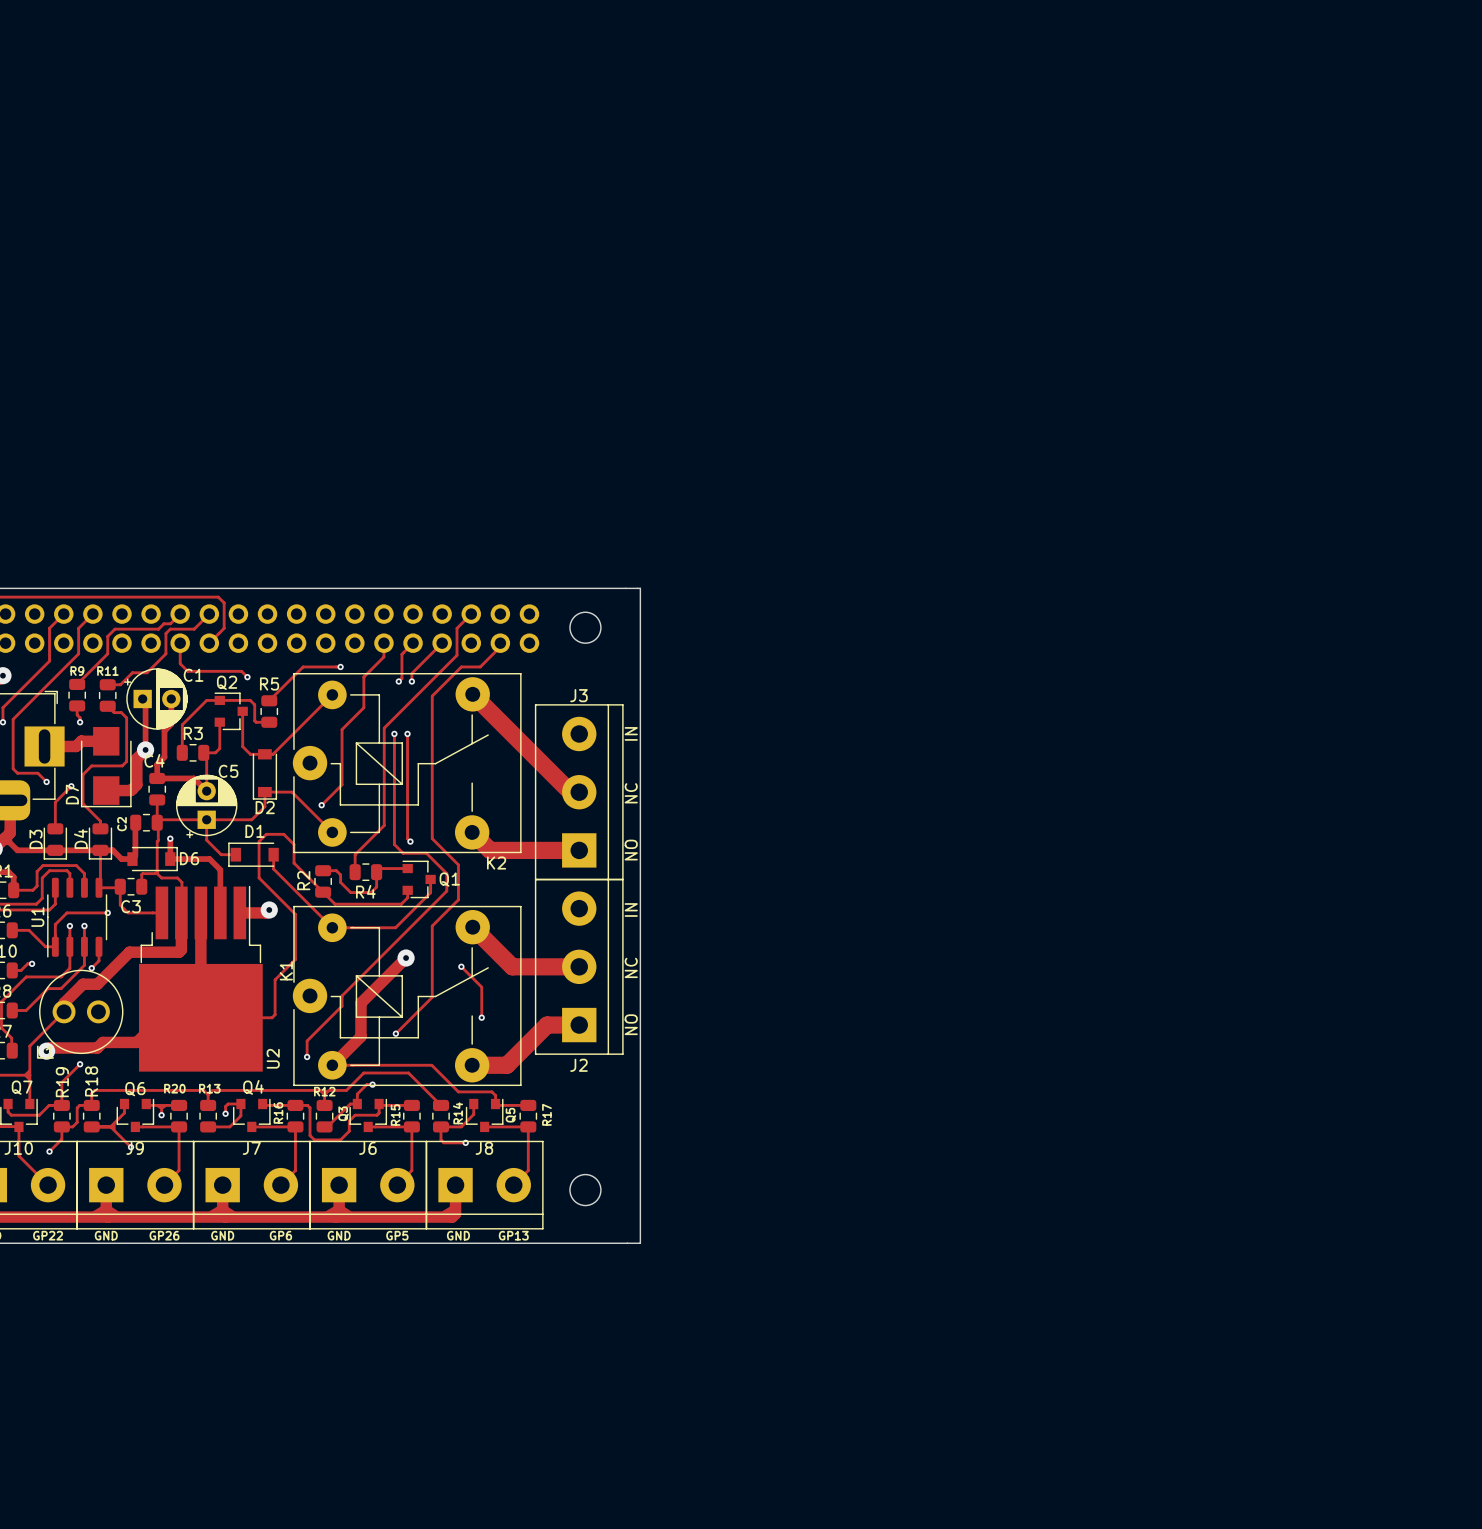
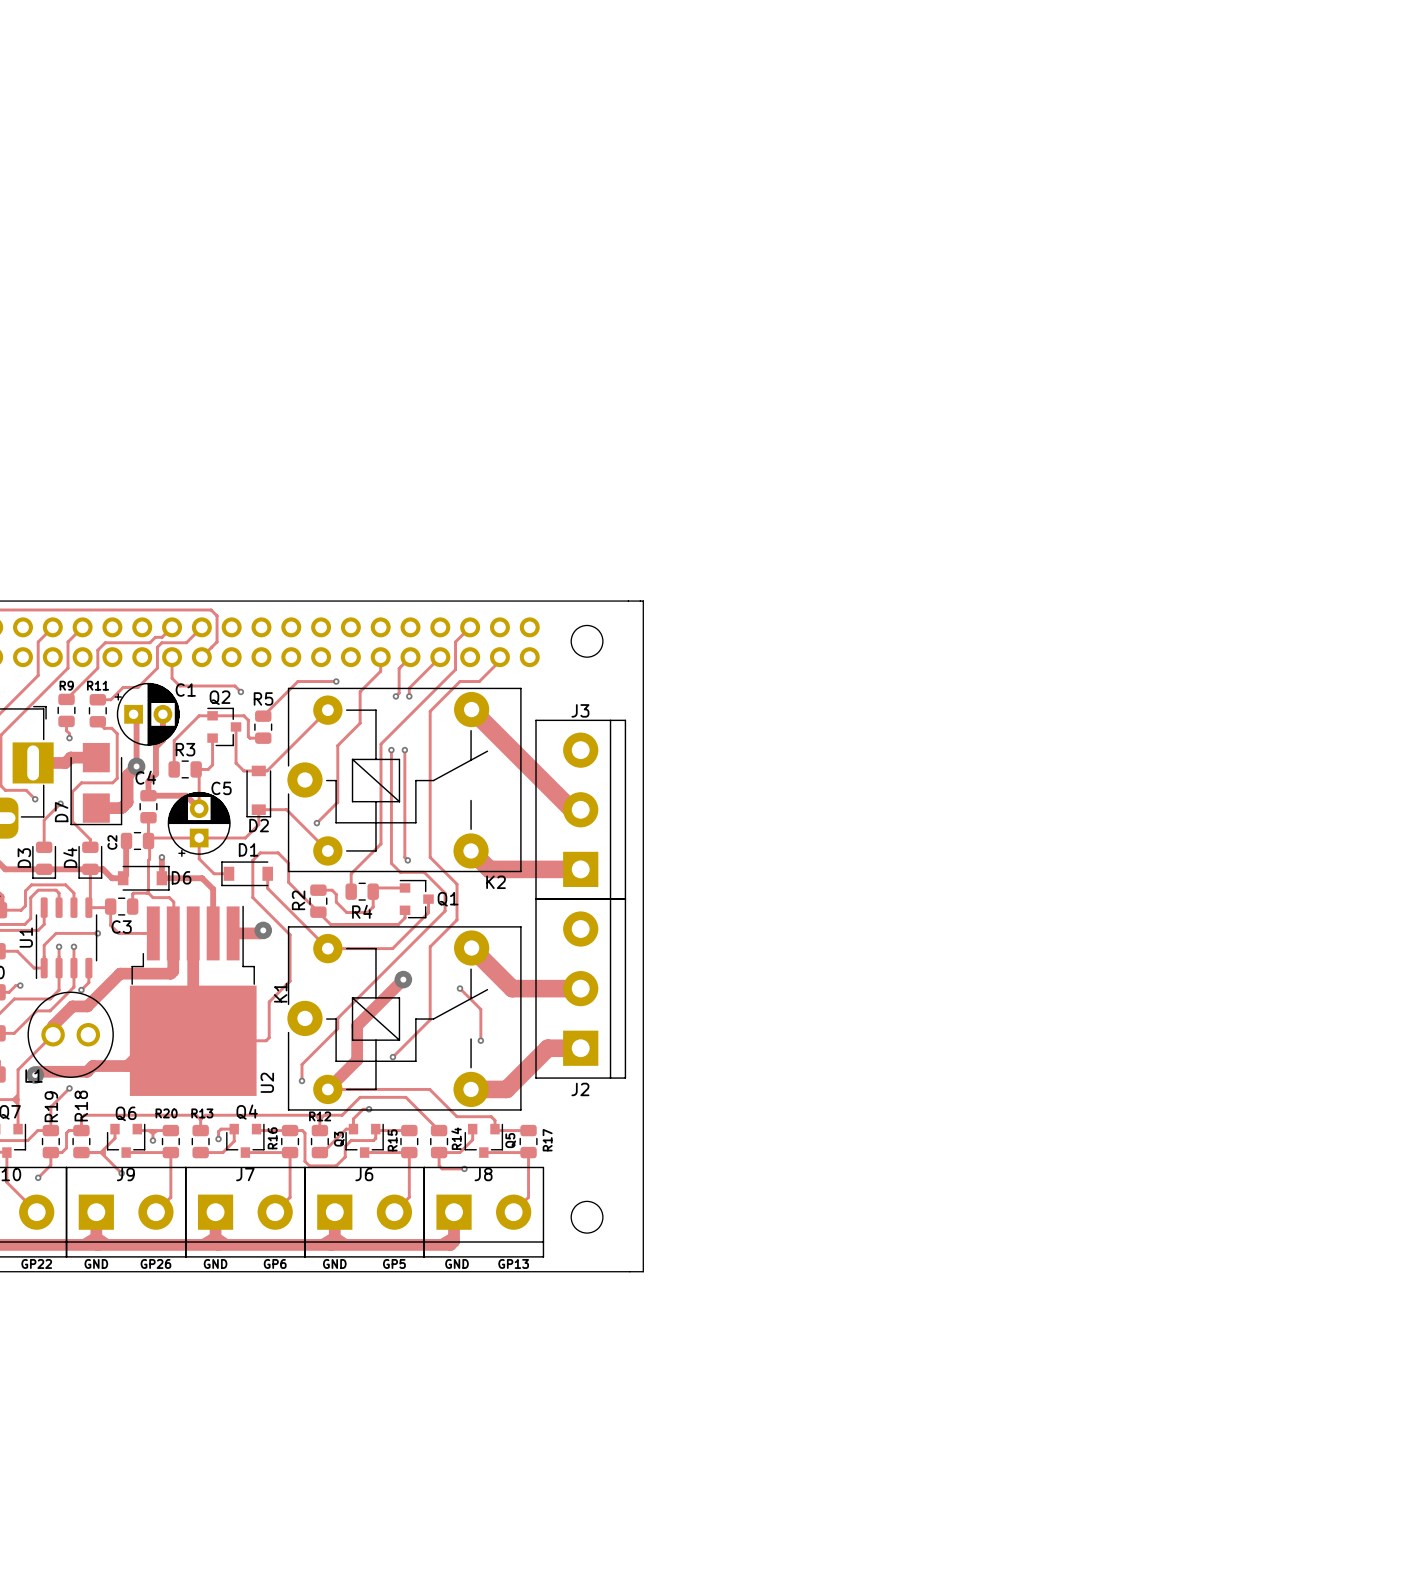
text: IN (631, 733) -> none
text: NC (631, 793) -> none
text: NO (631, 850) -> none
text: IN (631, 910) -> none
text: NC (631, 967) -> none
text: NO (631, 1024) -> none

